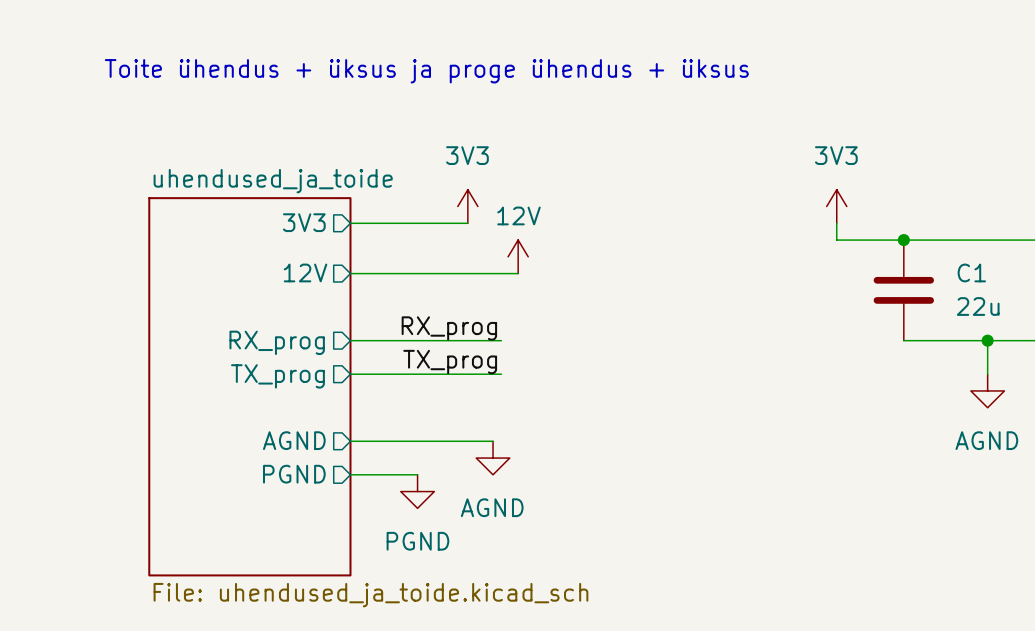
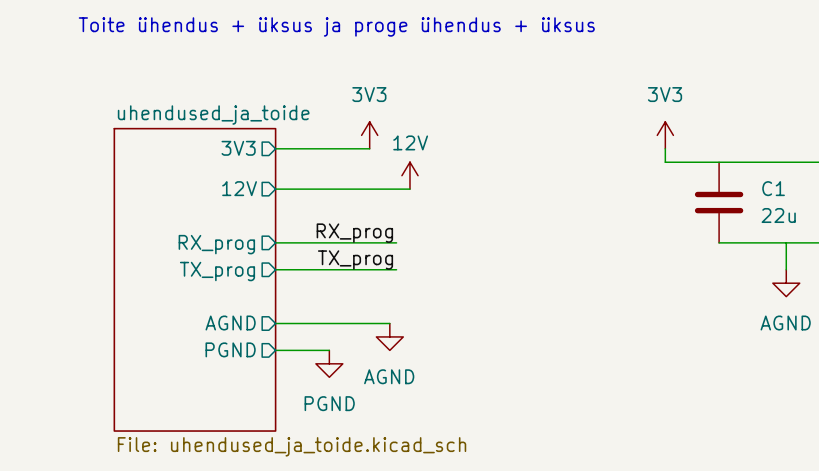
junction: (903, 240) -> none
junction: (987, 340) -> none

